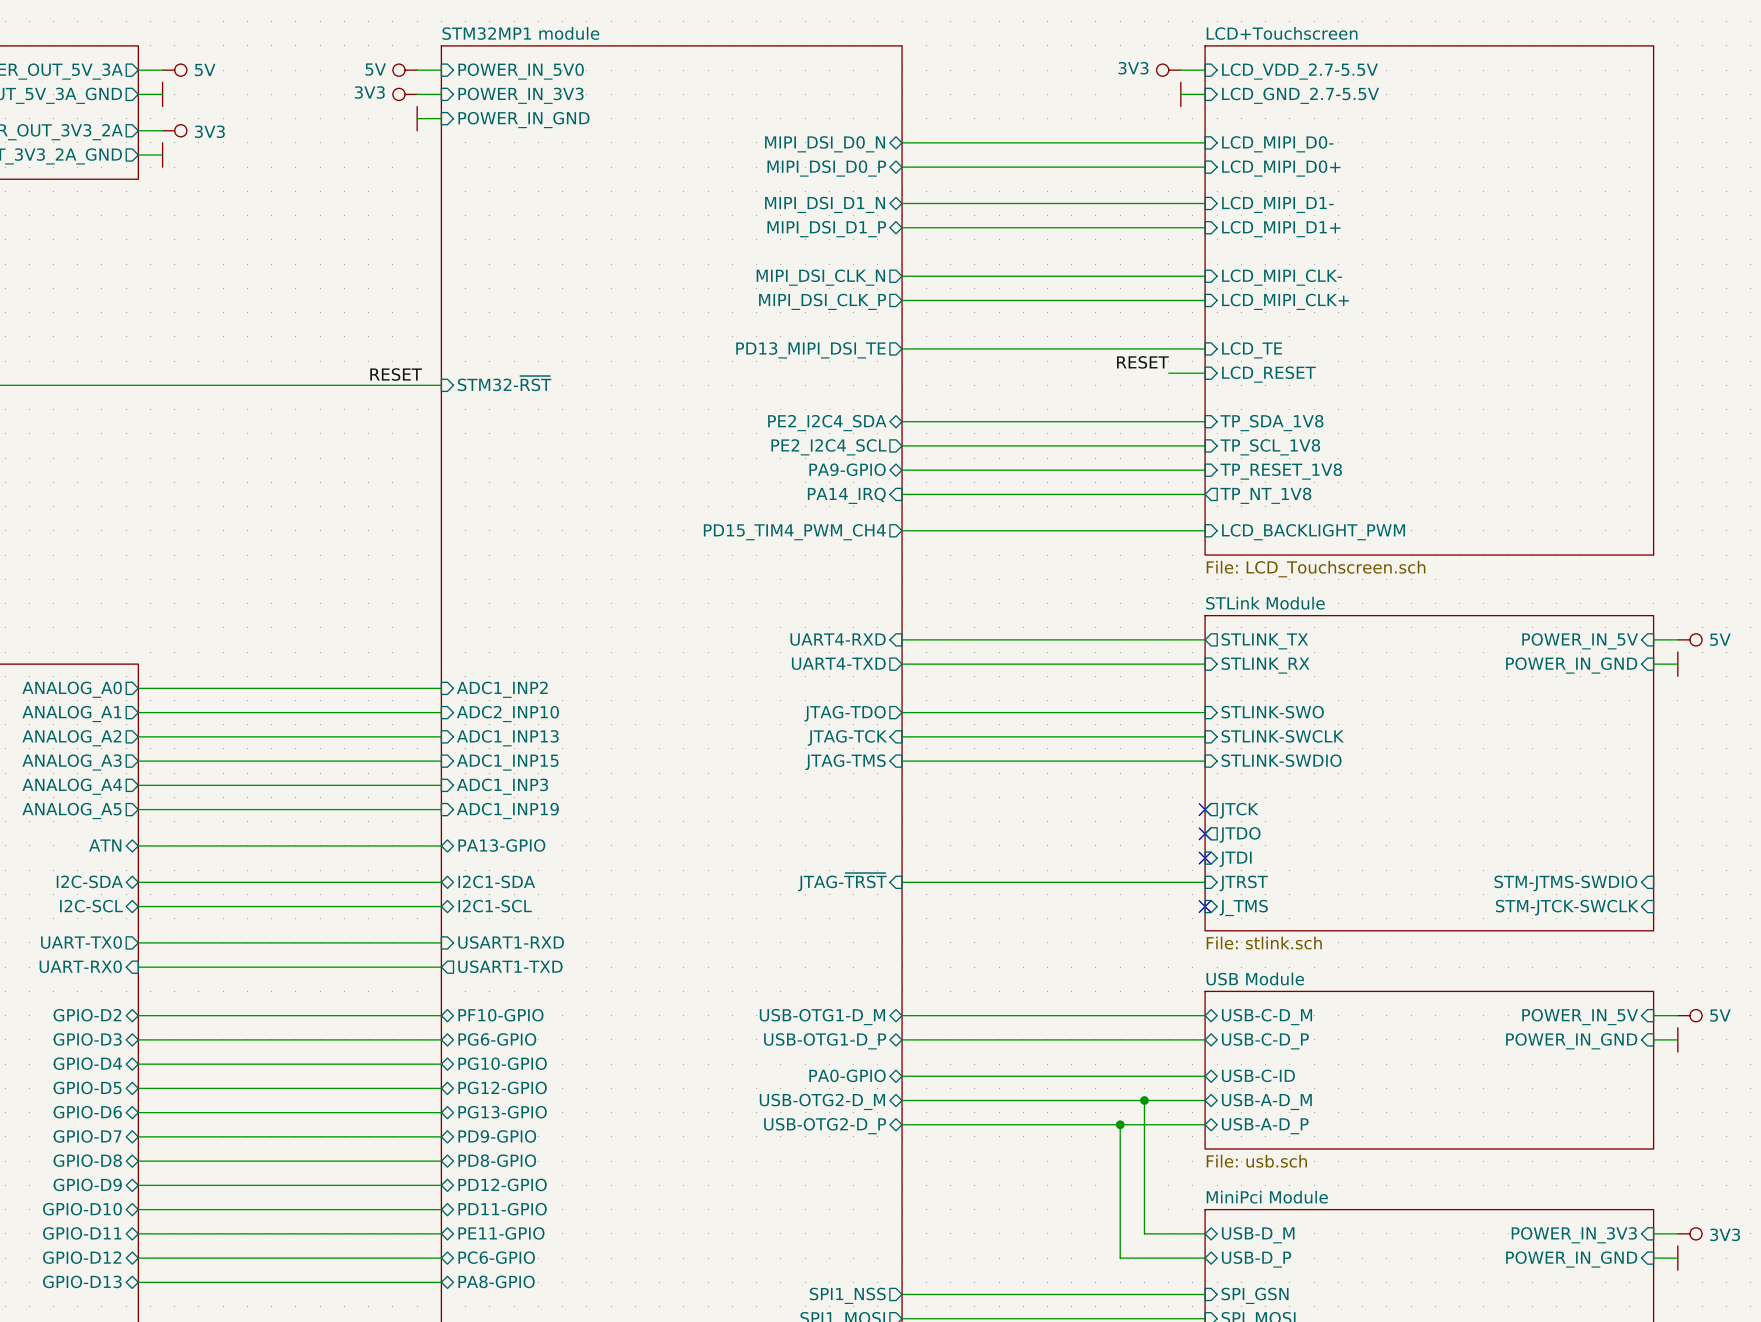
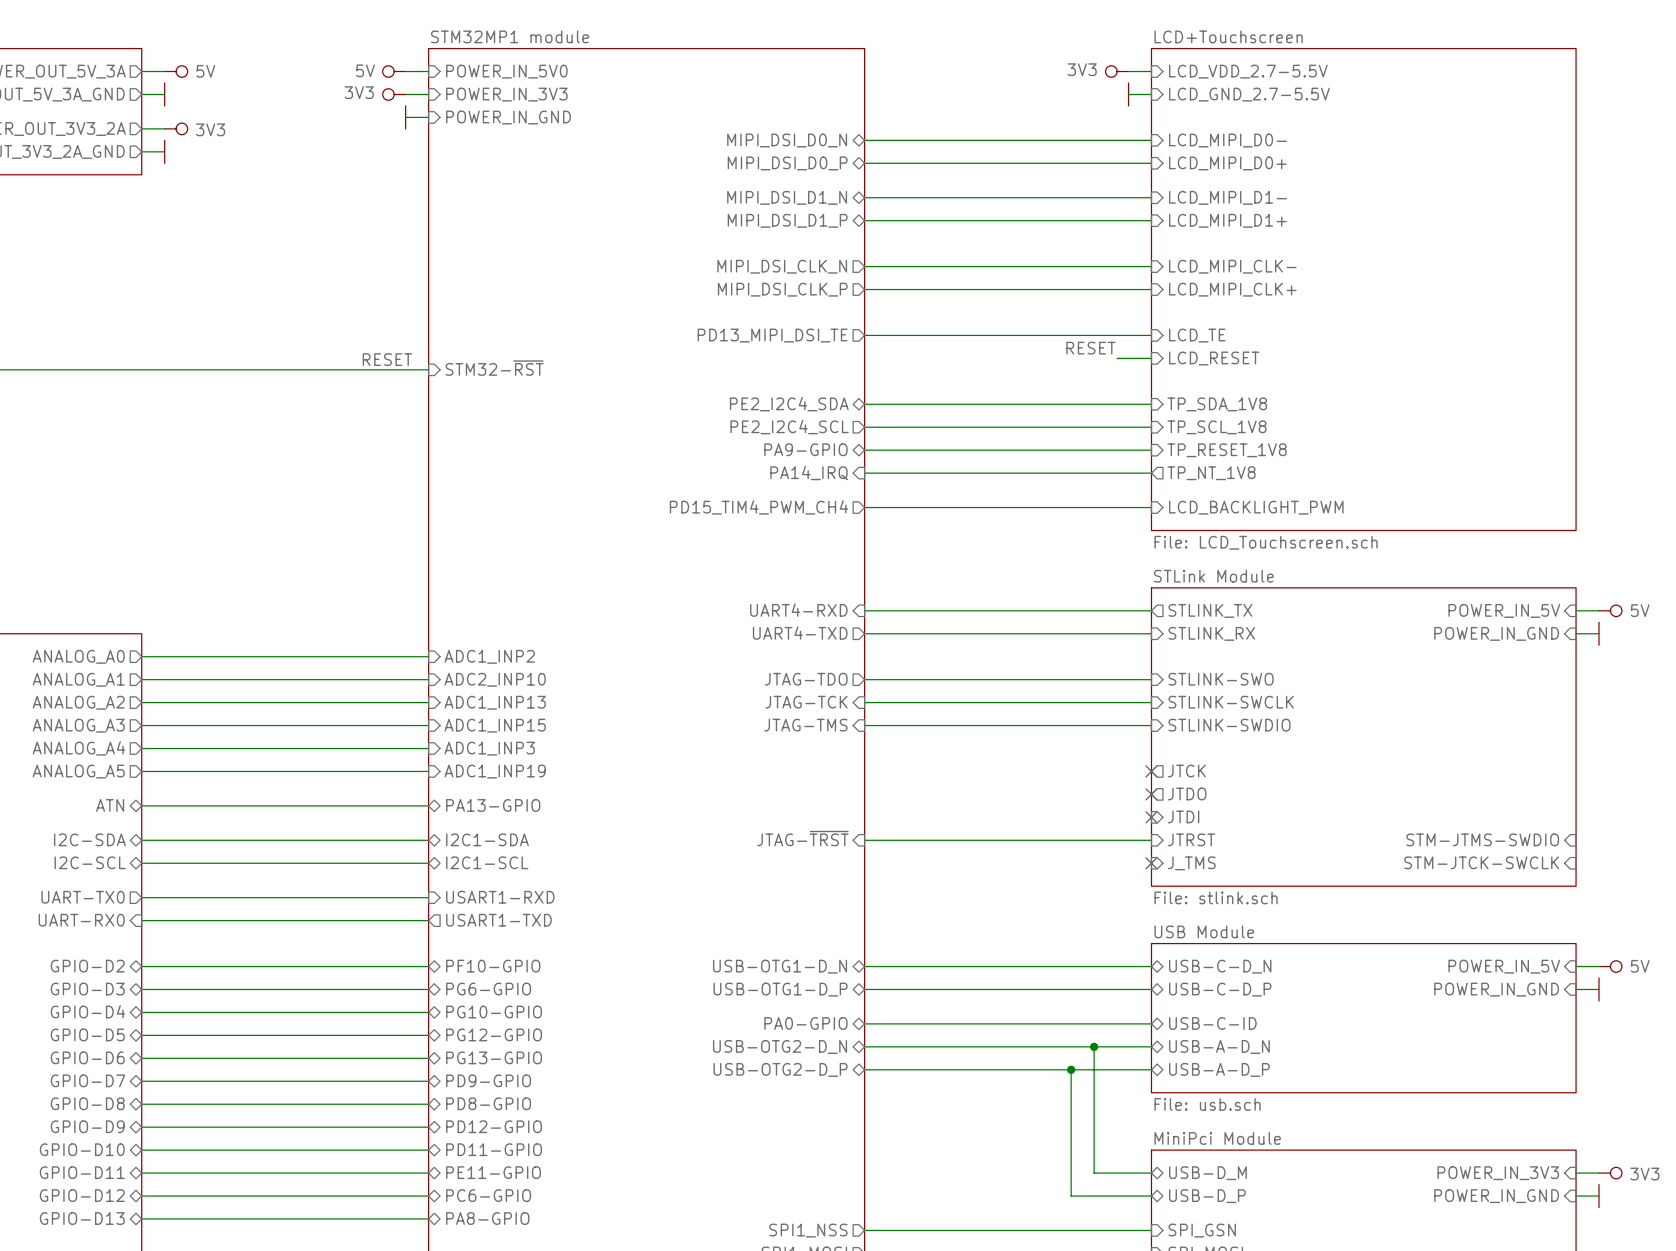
sheet pin: USB-OTG1-D_M (822, 1017) -> USB-OTG1-D_N (780, 966)
sheet pin: USB-C-D_M (1266, 1017) -> USB-C-D_N (1220, 966)
sheet pin: USB-OTG2-D_M (822, 1101) -> USB-OTG2-D_N (780, 1046)
sheet pin: USB-A-D_M (1266, 1101) -> USB-A-D_N (1219, 1046)

